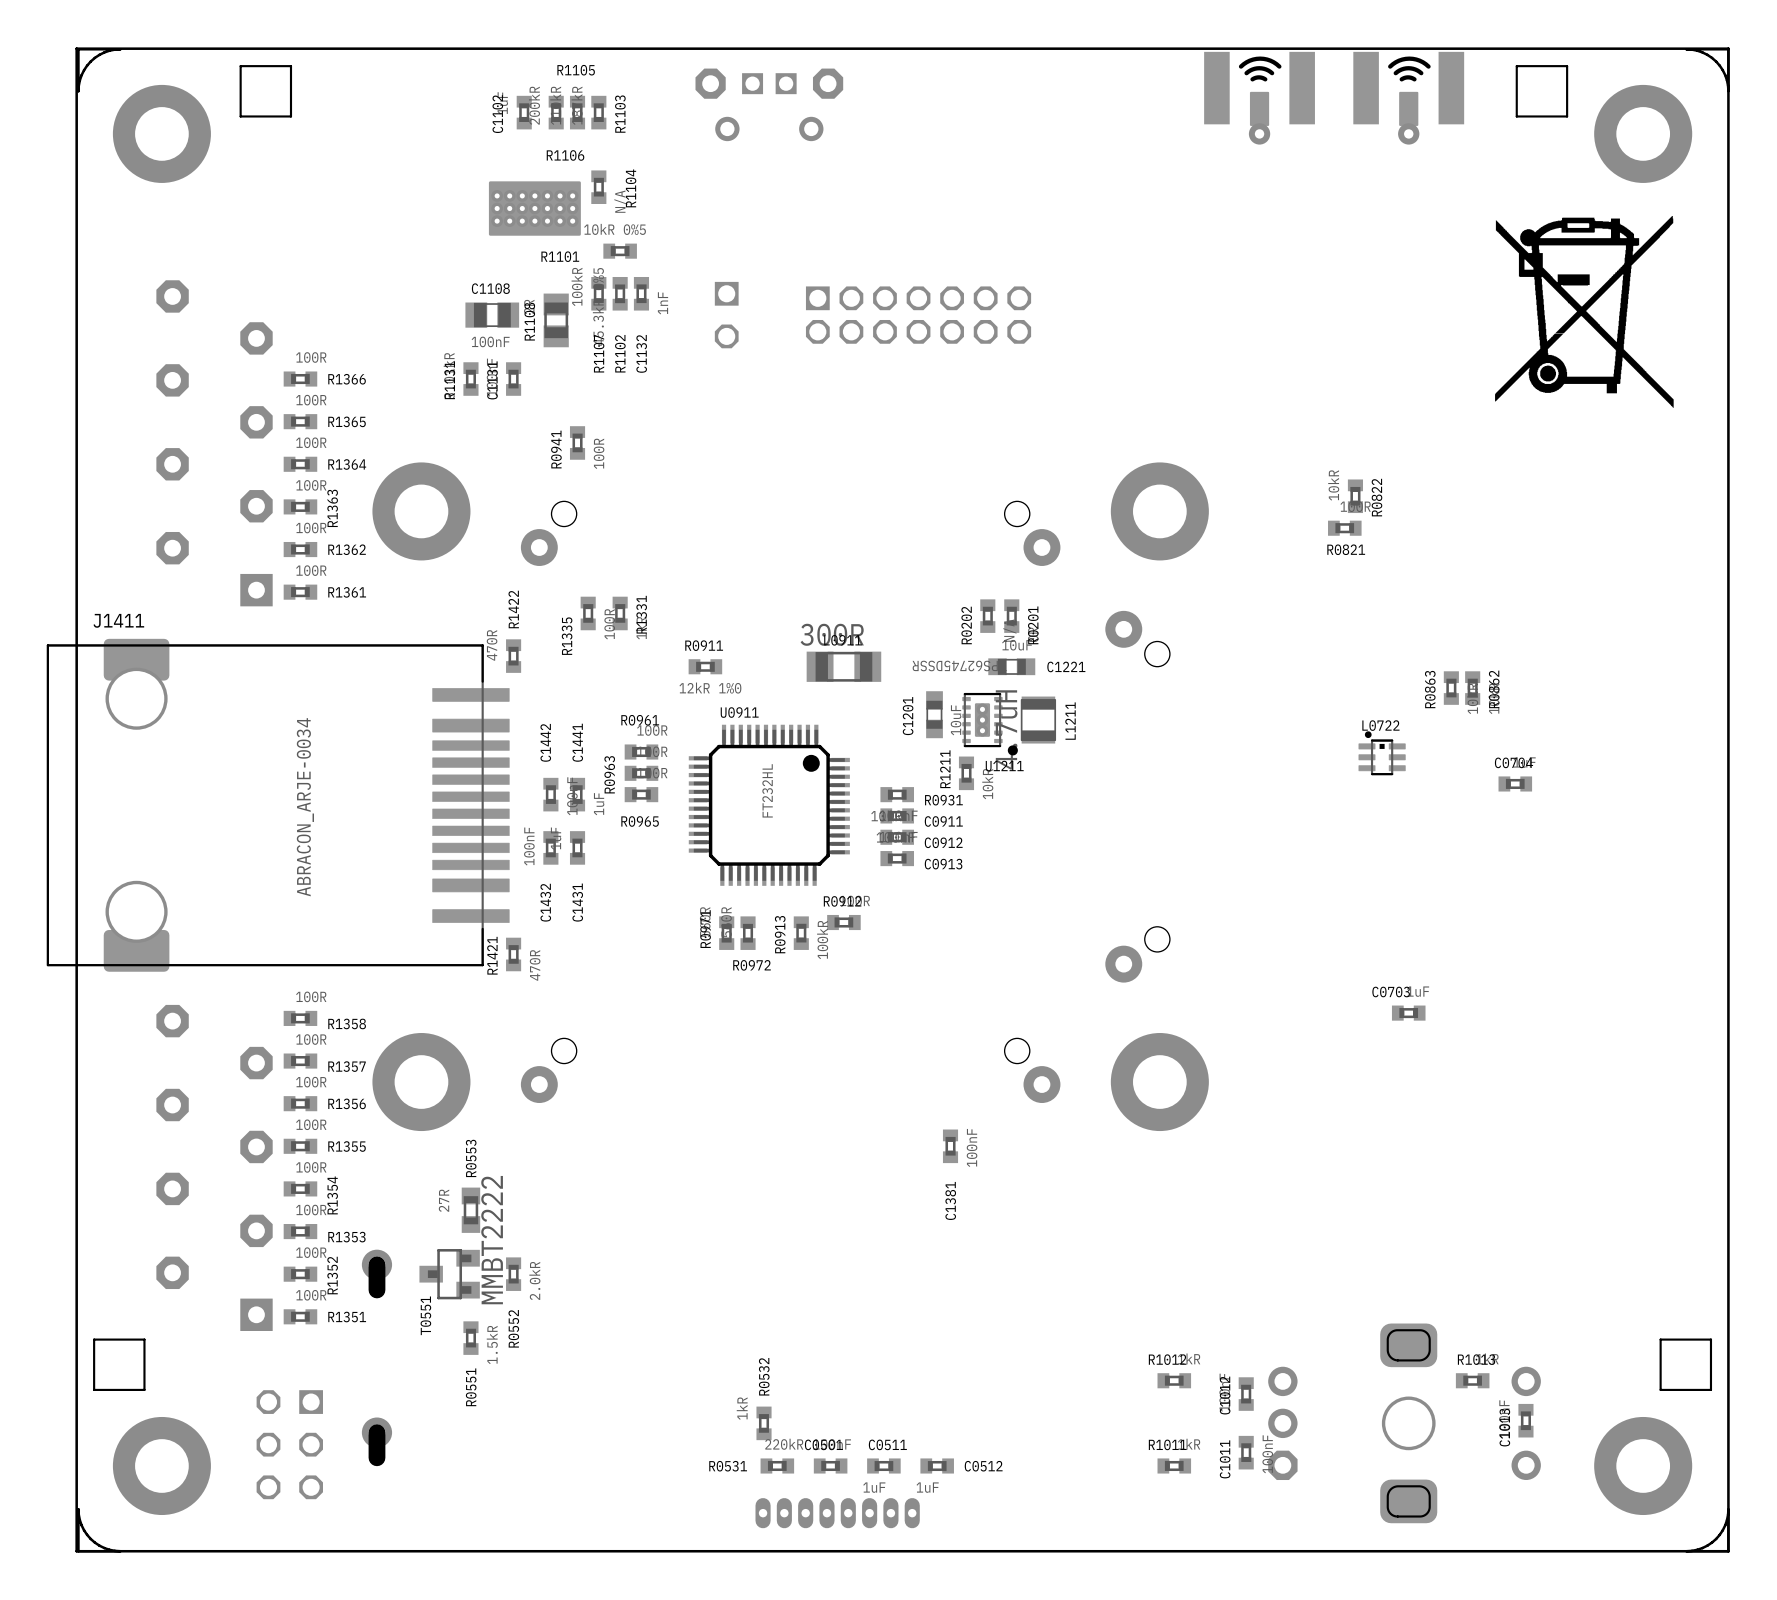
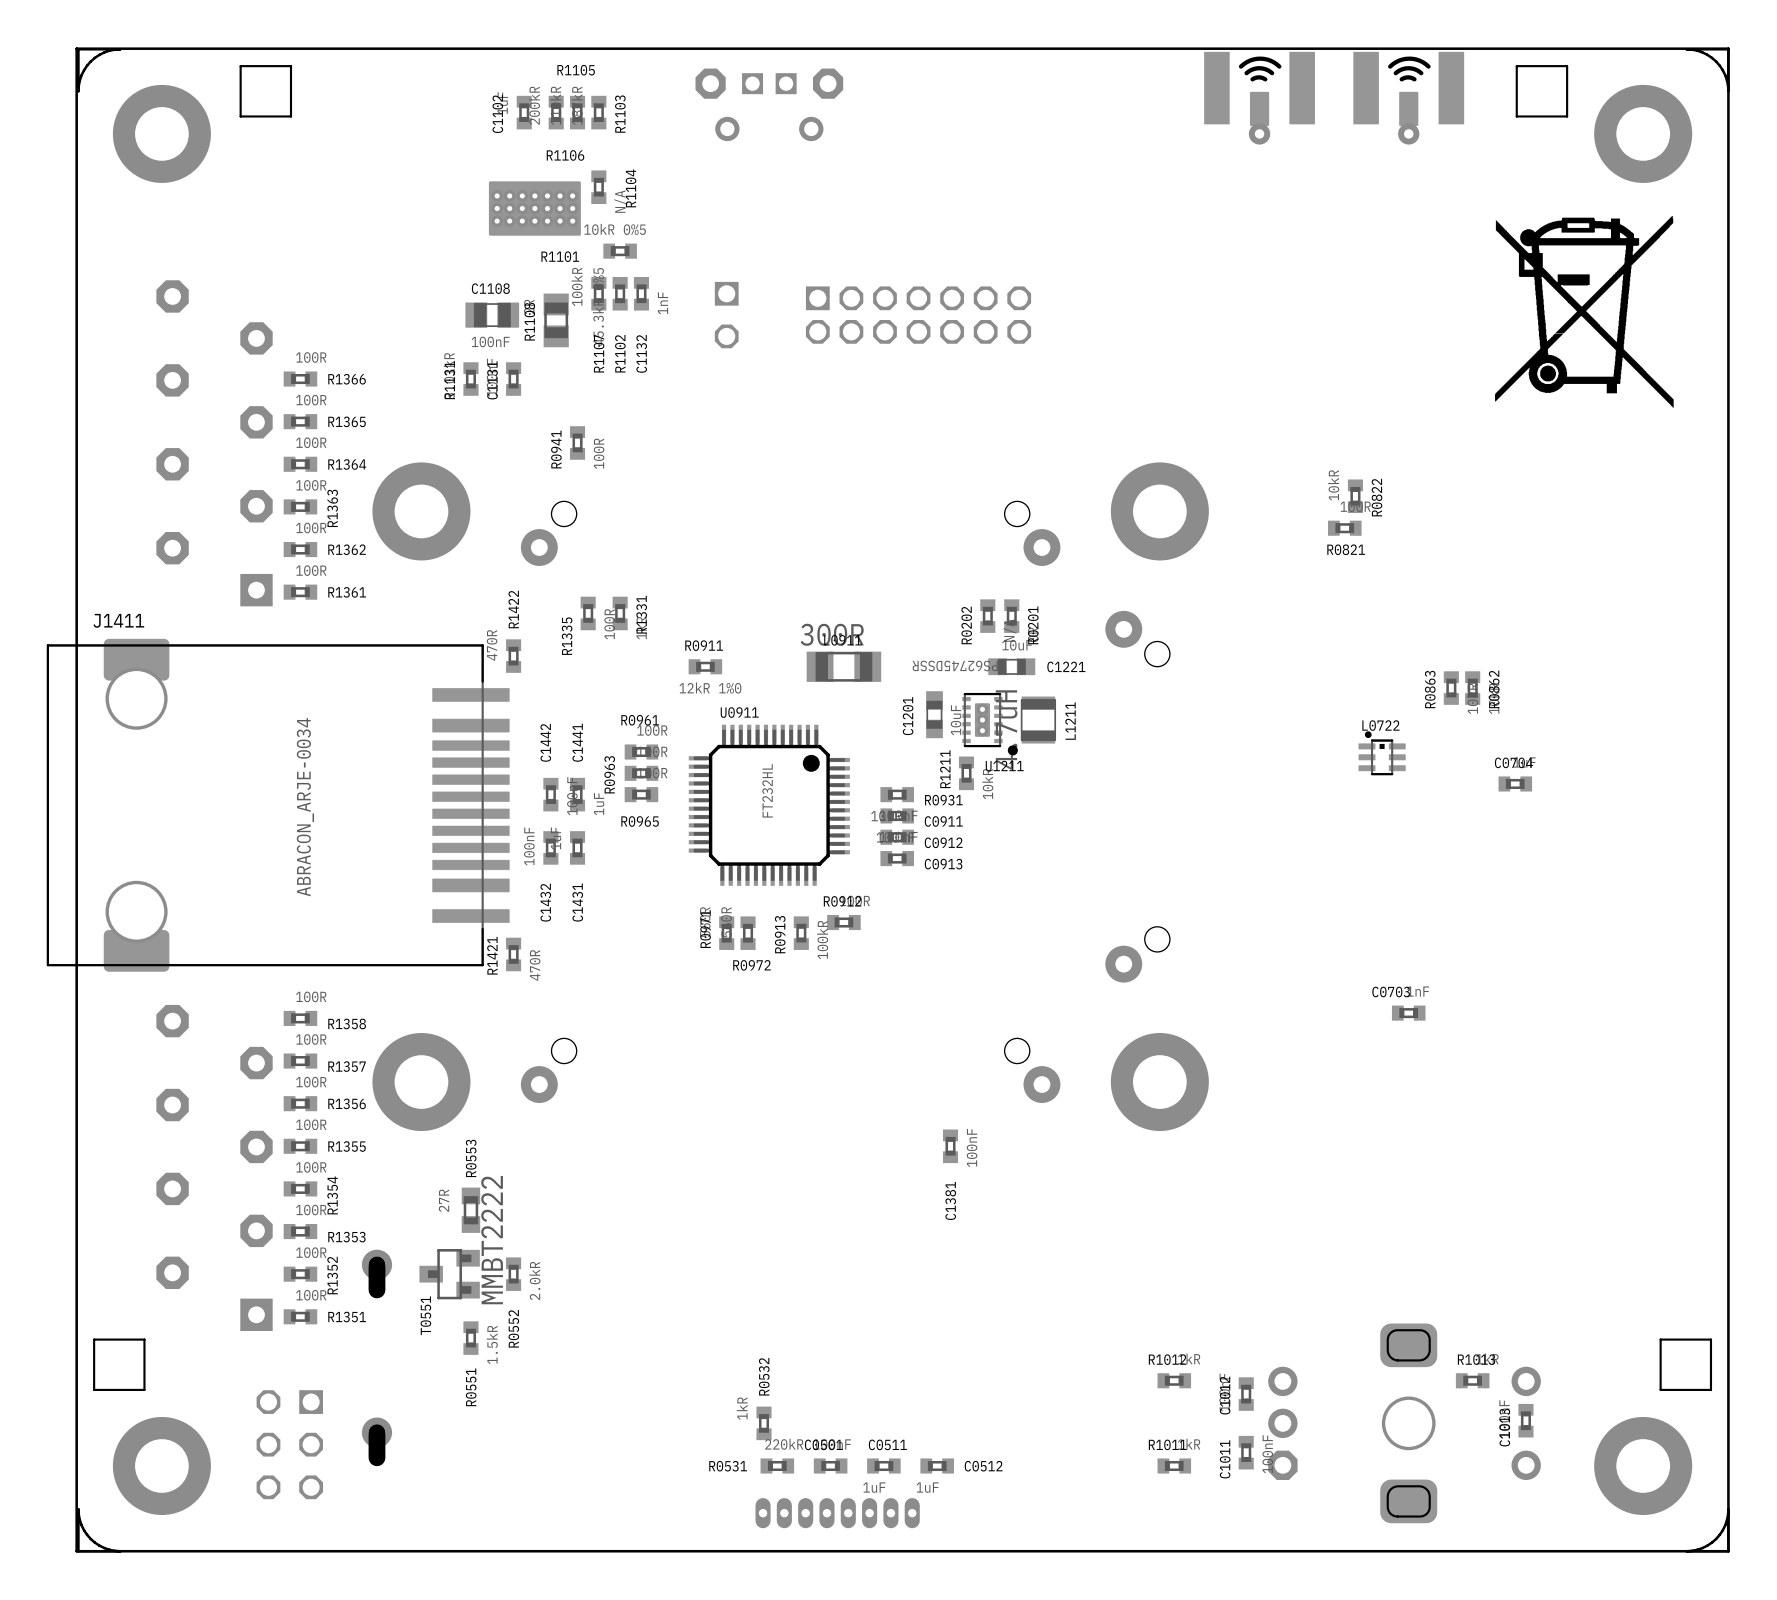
C0703 value: 1uF (1418, 991) -> 1nF (1418, 991)

